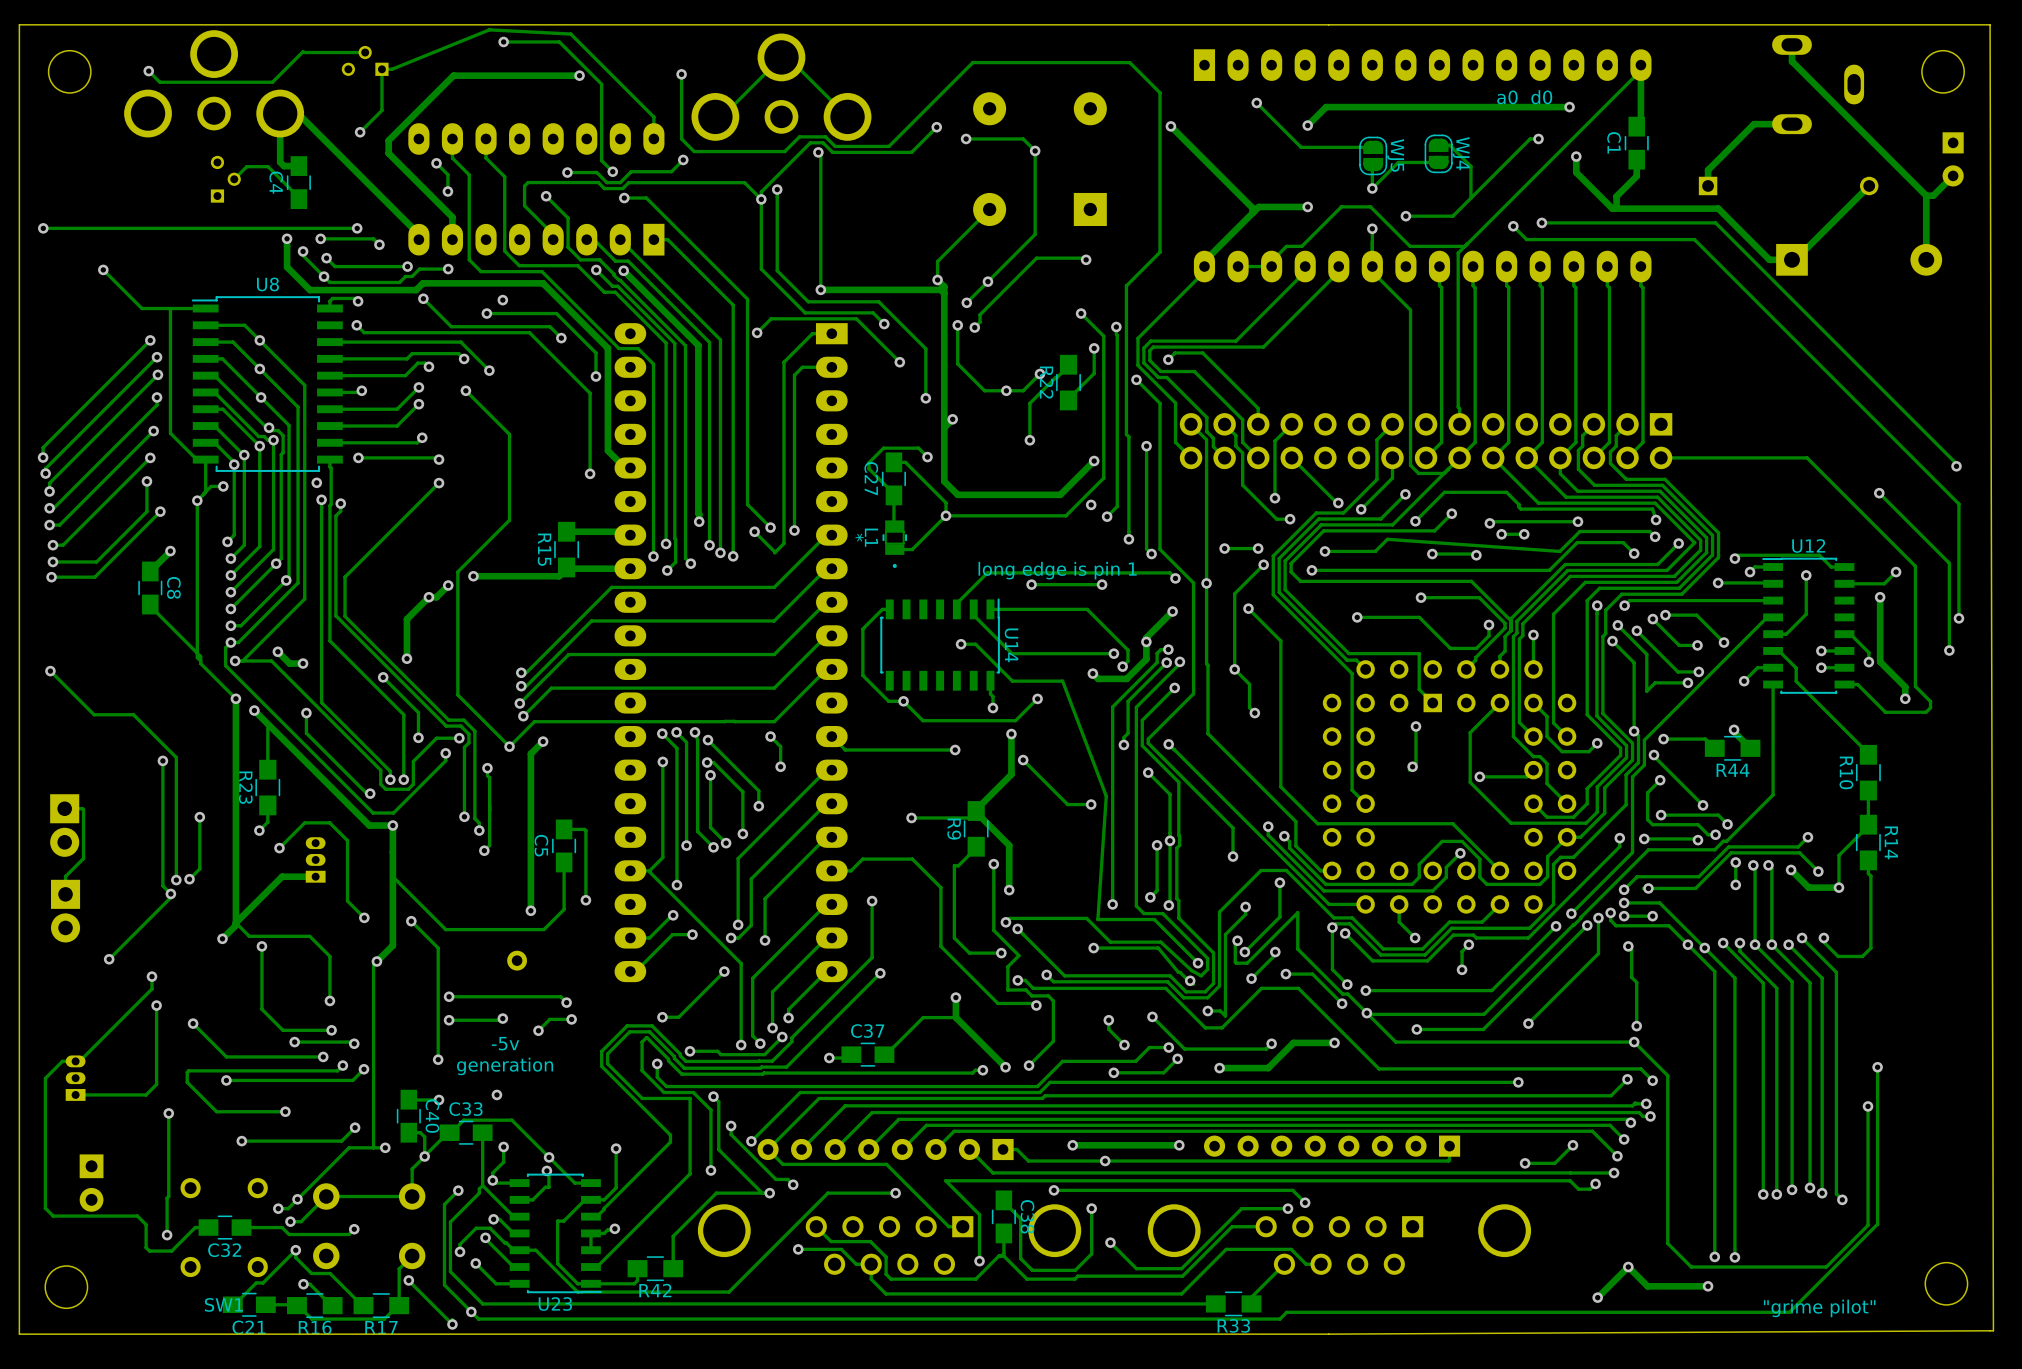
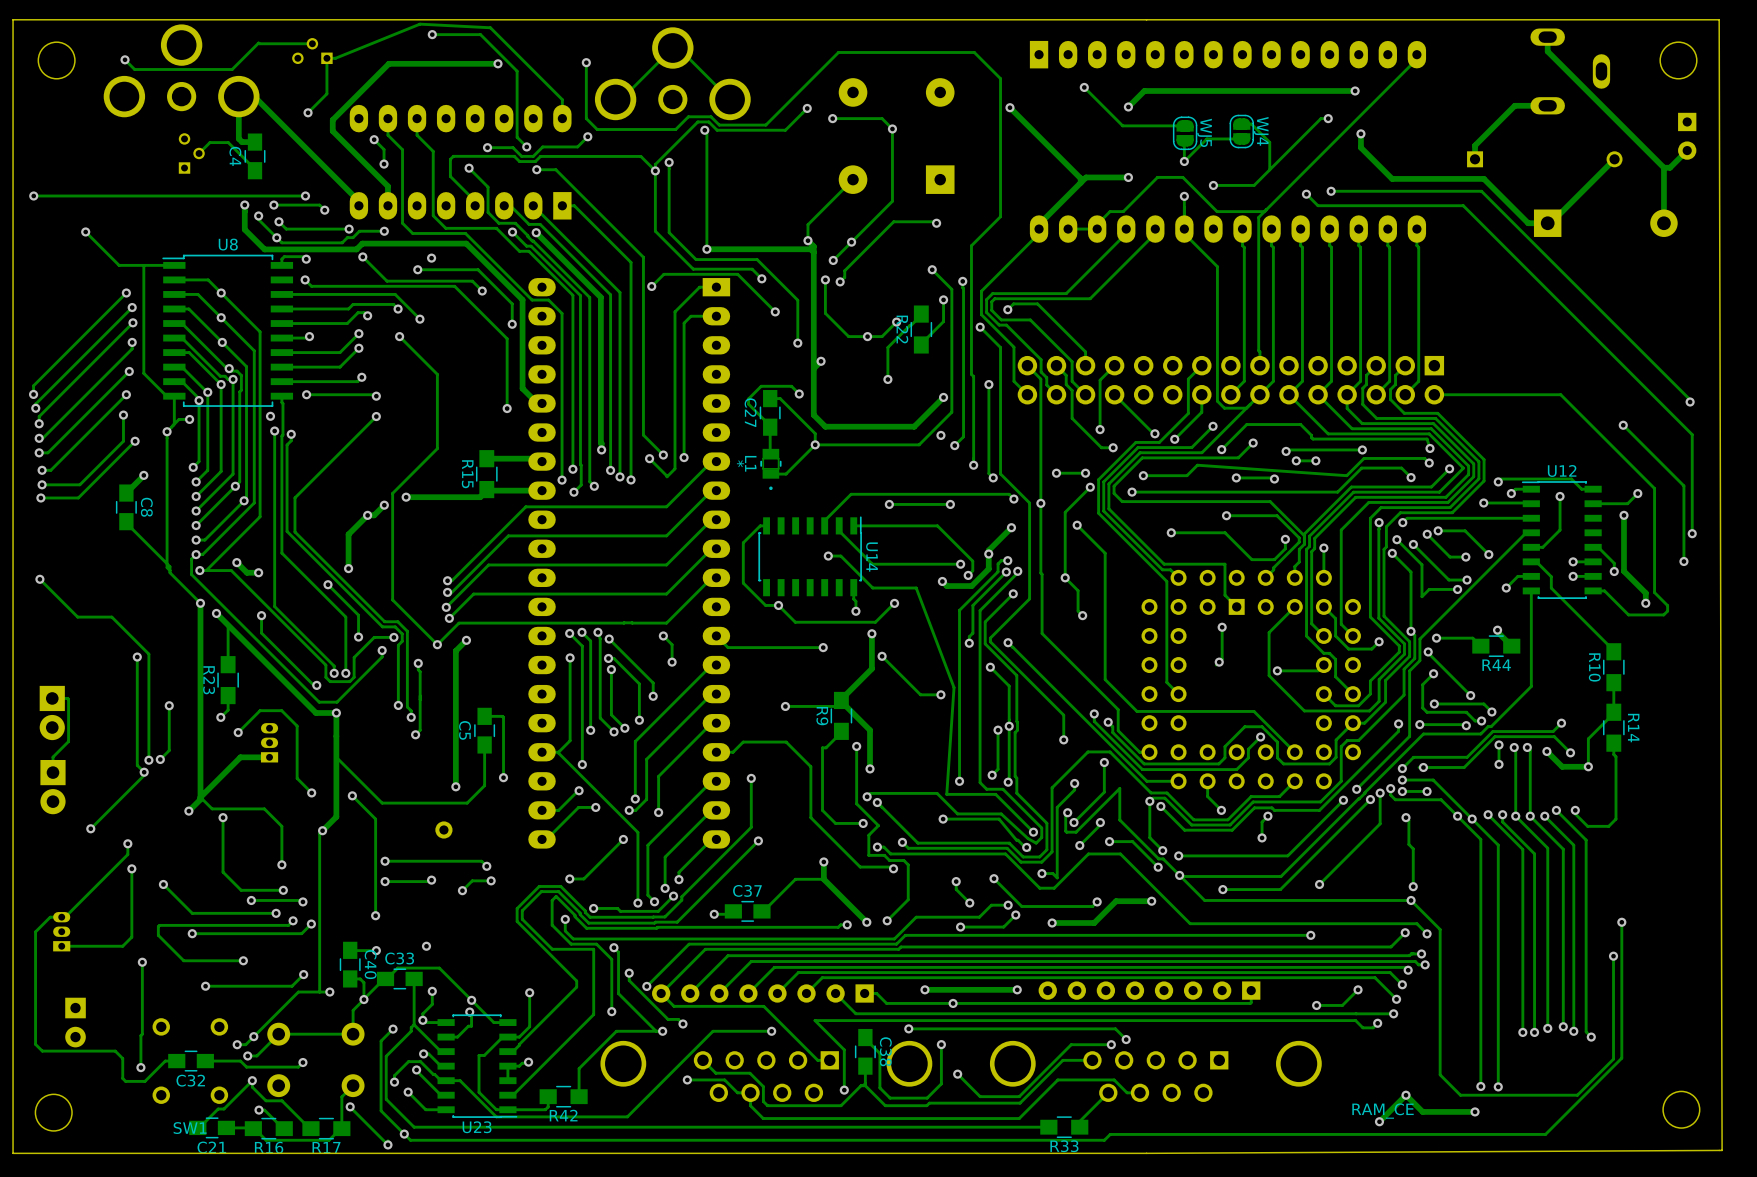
track: (1640, 65) (1640, 122) (1636, 126) -> none
text: a0 (1507, 97) -> none
text: d0 (1541, 97) -> none
C1: (1636, 143) -> none
track: (1636, 159) (1636, 176) (1616, 196) (1616, 208) -> none
text: long edge is pin 1 (1057, 570) -> none
text: -5v (505, 1043) -> none
text: generation (505, 1066) -> none
text: none -> RAM_CE (1383, 1111)
text: "grime pilot" (1819, 1308) -> none

